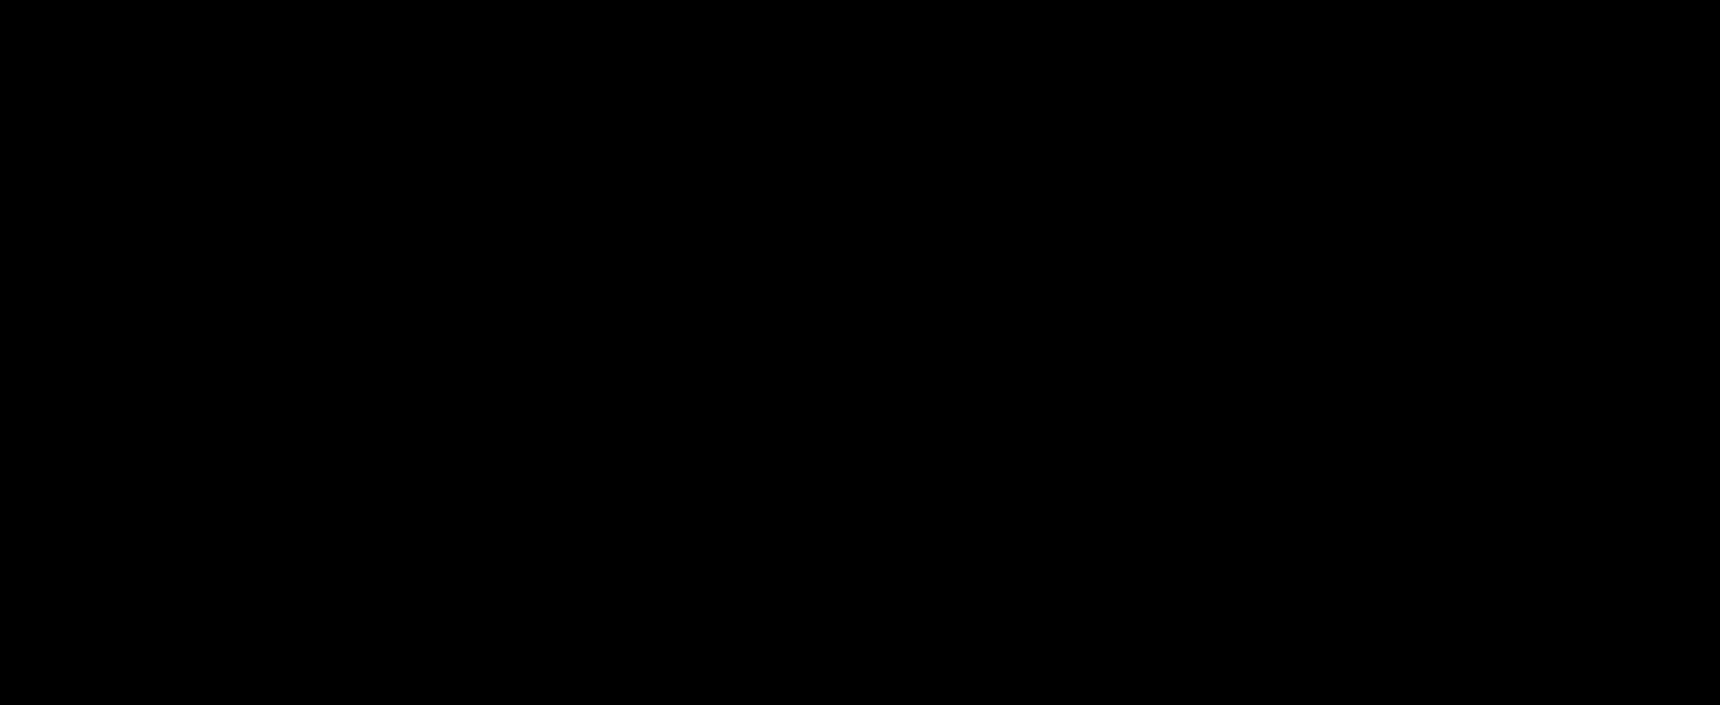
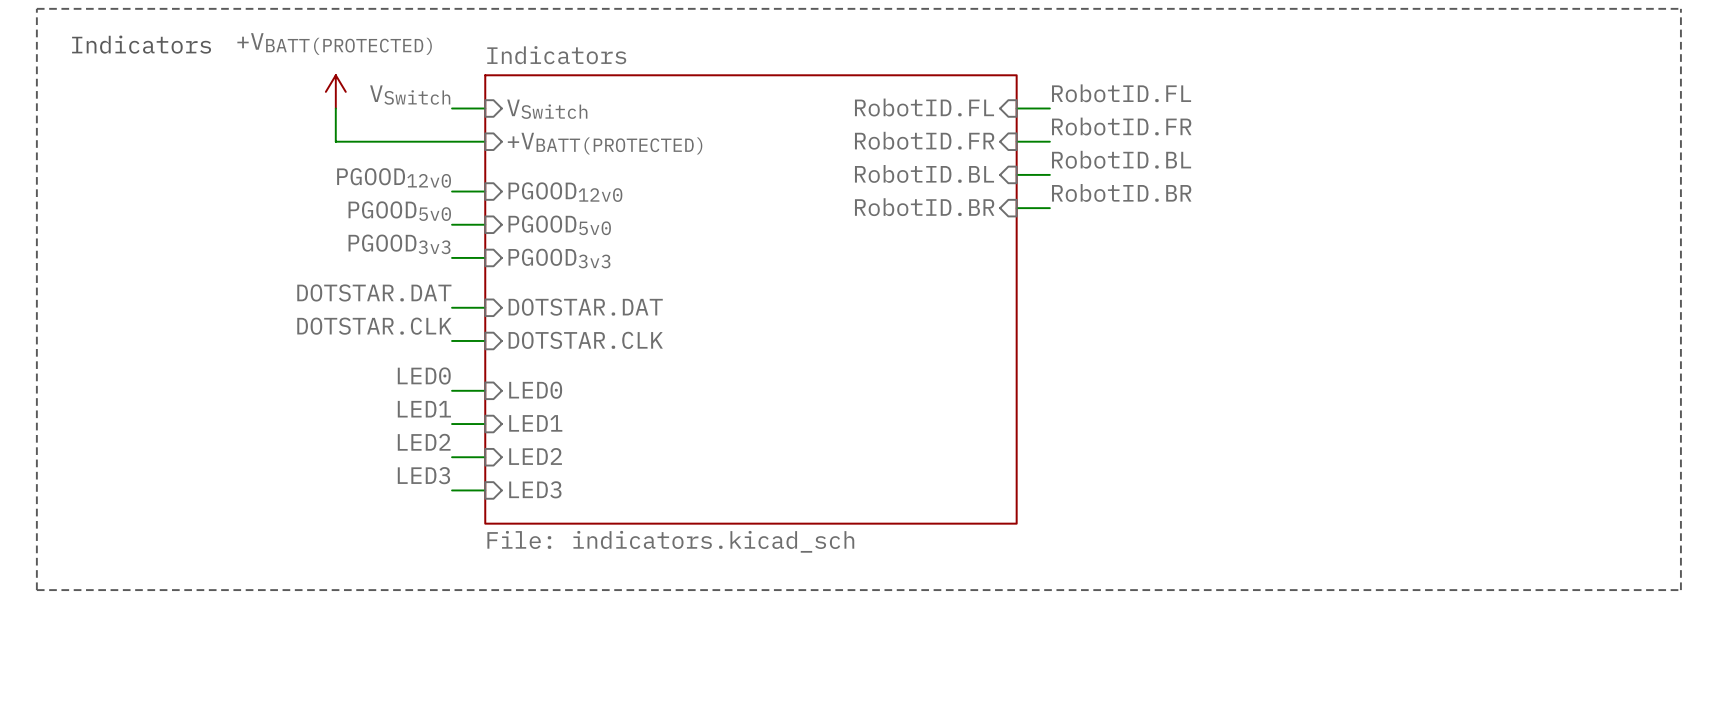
line: none -> (36, 8) (36, 590) (1680, 590) (1680, 8) (36, 8)
text: none -> Indicators (141, 44)
power symbol: none -> +VBATT(PROTECTED) (335, 91)
label: none -> RobotID.FL (1121, 93)
label: none -> VSwitch (410, 95)
sheet pin: none -> RobotID.FL (924, 107)
wire: none -> (335, 108) (335, 141) (485, 141)
wire: none -> (452, 108) (485, 108)
wire: none -> (1016, 108) (1049, 108)
sheet pin: none -> VSwitch (547, 109)
label: none -> RobotID.FR (1121, 126)
sheet pin: none -> RobotID.FR (924, 140)
wire: none -> (1016, 141) (1049, 141)
sheet pin: none -> +VBATT(PROTECTED) (605, 143)
label: none -> RobotID.BL (1121, 159)
sheet pin: none -> RobotID.BL (924, 173)
wire: none -> (1016, 174) (1049, 174)
label: none -> PGOOD12v0 (394, 177)
wire: none -> (452, 191) (485, 191)
sheet pin: none -> PGOOD12v0 (565, 192)
label: none -> RobotID.BR (1121, 192)
sheet pin: none -> RobotID.BR (924, 207)
wire: none -> (1016, 208) (1049, 208)
label: none -> PGOOD5v0 (399, 211)
wire: none -> (452, 224) (485, 224)
sheet pin: none -> PGOOD5v0 (559, 225)
label: none -> PGOOD3v3 (399, 244)
wire: none -> (452, 257) (485, 257)
sheet pin: none -> PGOOD3v3 (559, 258)
label: none -> DOTSTAR.DAT (374, 292)
sheet Indicators: none -> File: indicators.kicad_sch (750, 299)
wire: none -> (452, 307) (485, 307)
sheet pin: none -> DOTSTAR.DAT (585, 307)
label: none -> DOTSTAR.CLK (374, 326)
wire: none -> (452, 340) (485, 340)
sheet pin: none -> DOTSTAR.CLK (585, 340)
label: none -> LED0 (424, 375)
wire: none -> (452, 390) (485, 390)
sheet pin: none -> LED0 (535, 390)
label: none -> LED1 (424, 409)
sheet pin: none -> LED1 (535, 423)
wire: none -> (452, 424) (485, 424)
label: none -> LED2 (424, 442)
sheet pin: none -> LED2 (535, 456)
wire: none -> (452, 457) (485, 457)
label: none -> LED3 (423, 475)
sheet pin: none -> LED3 (535, 489)
wire: none -> (452, 490) (485, 490)

